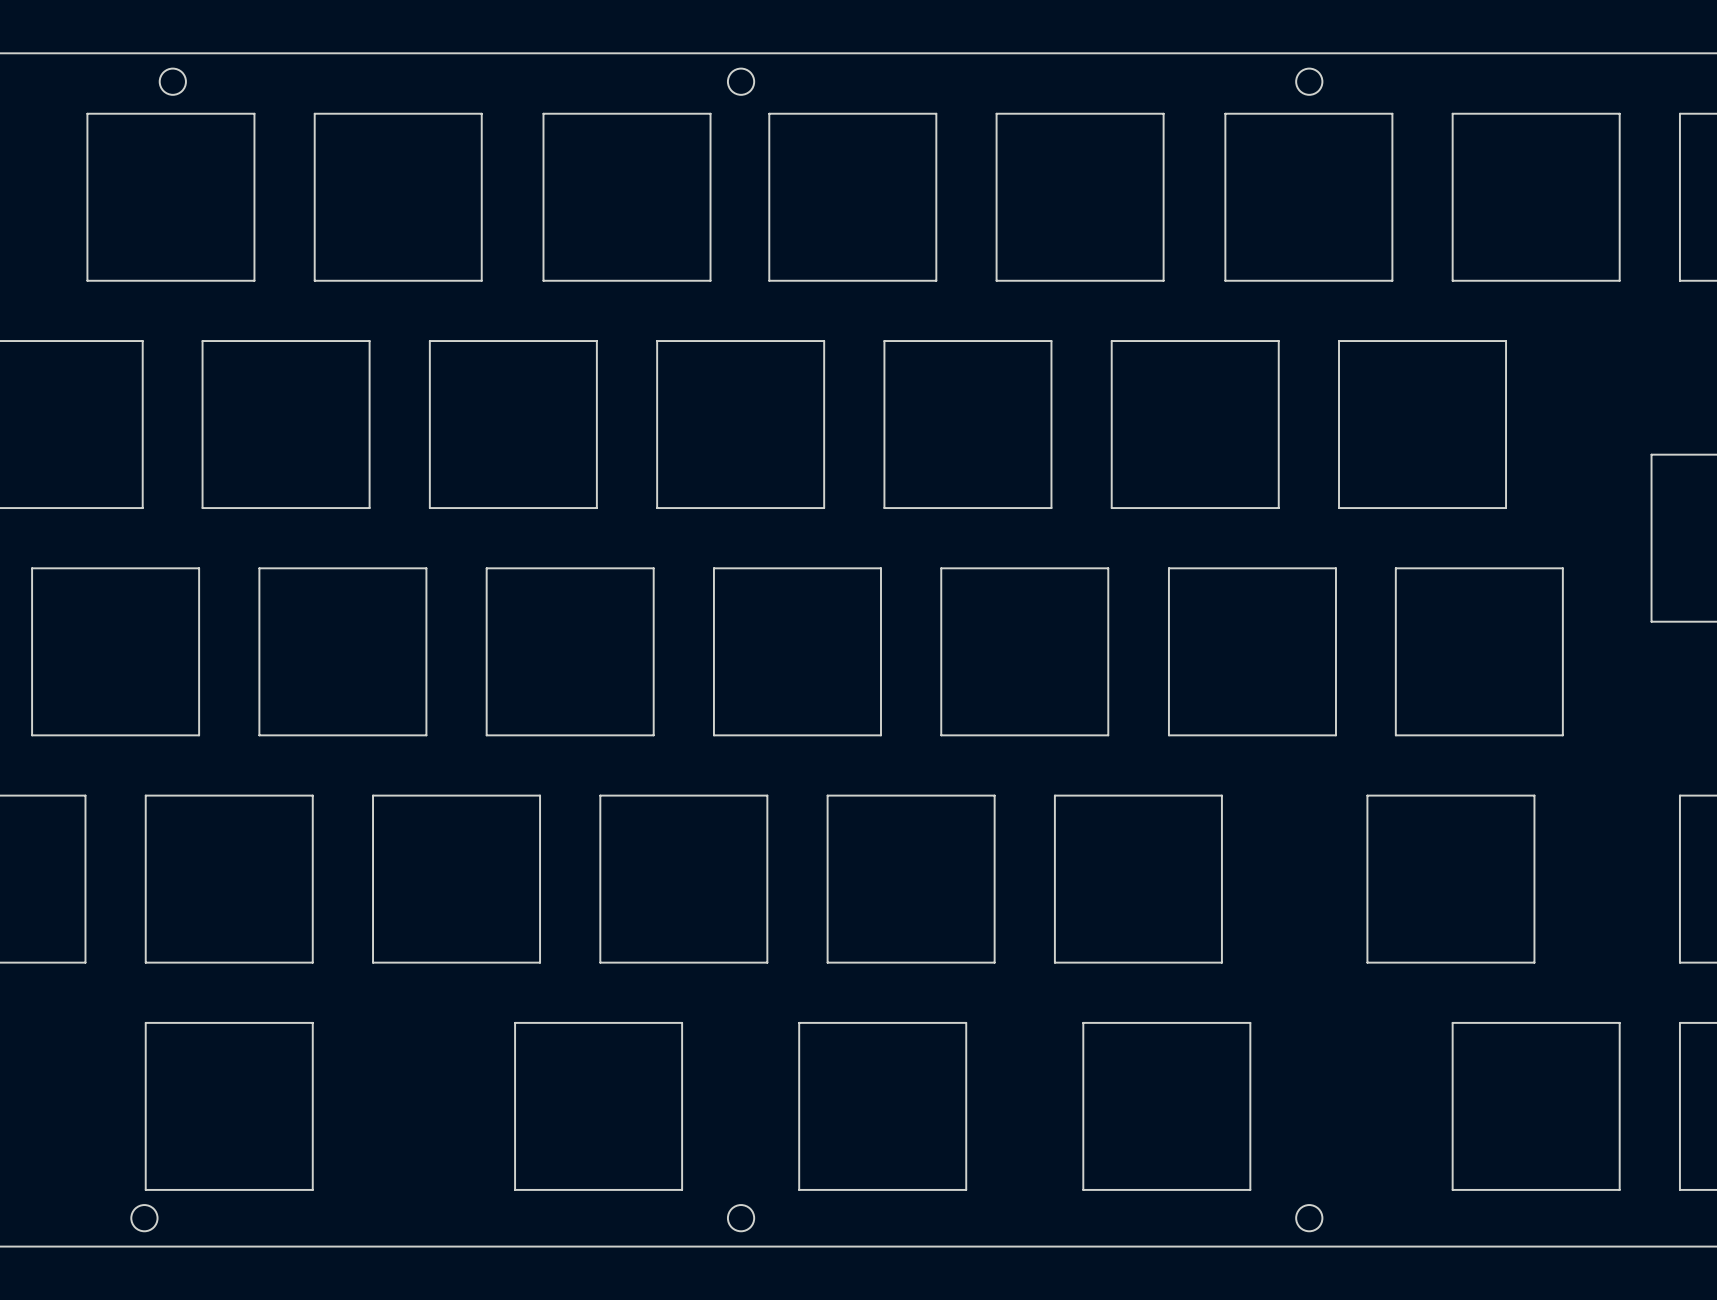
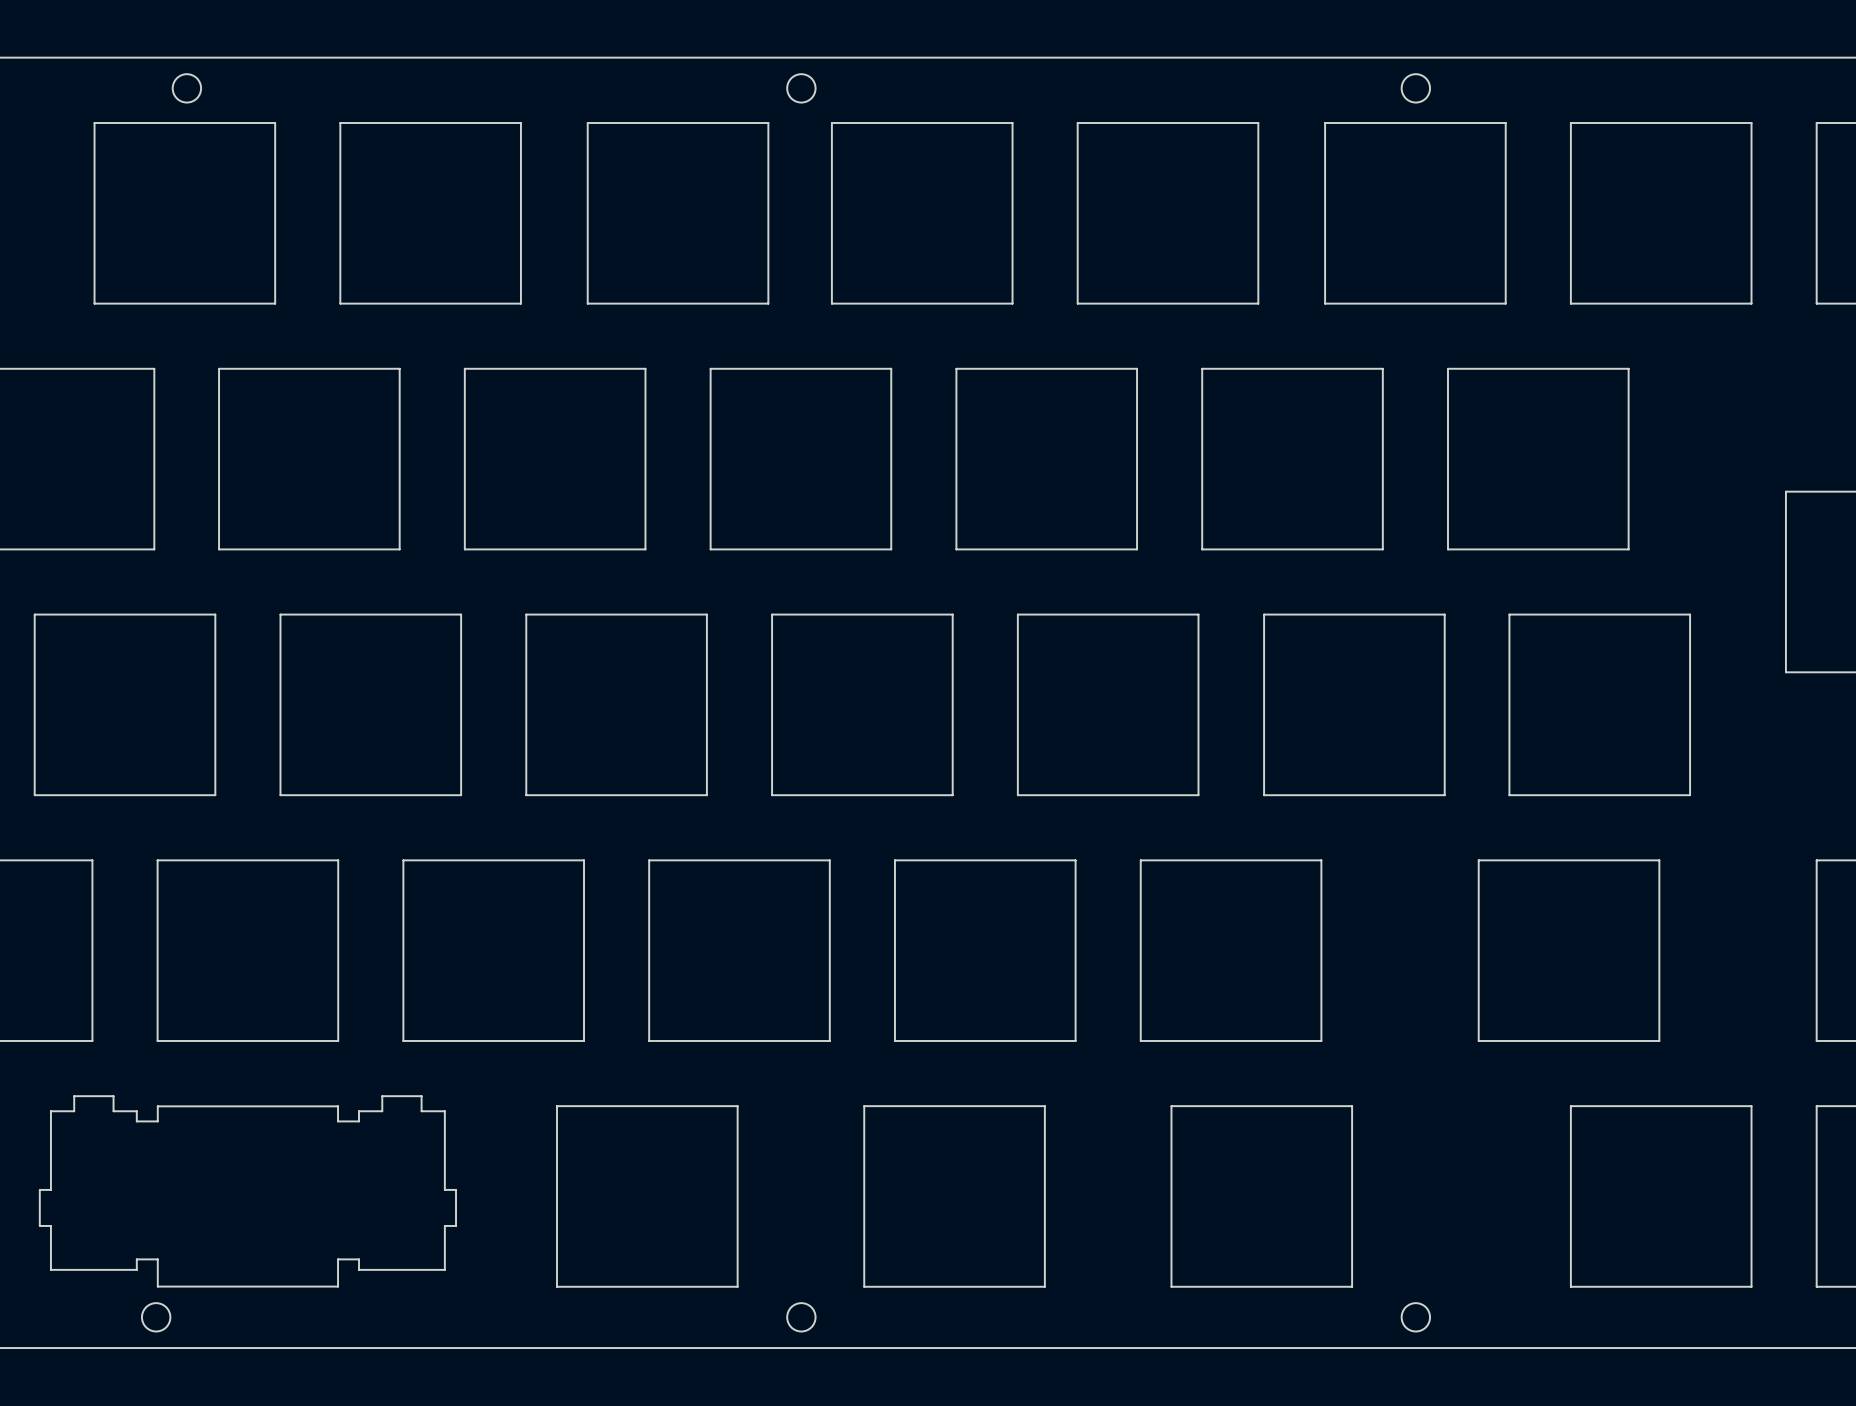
drawing shape: [145, 1022, 314, 1191] -> [39, 1095, 457, 1288]

